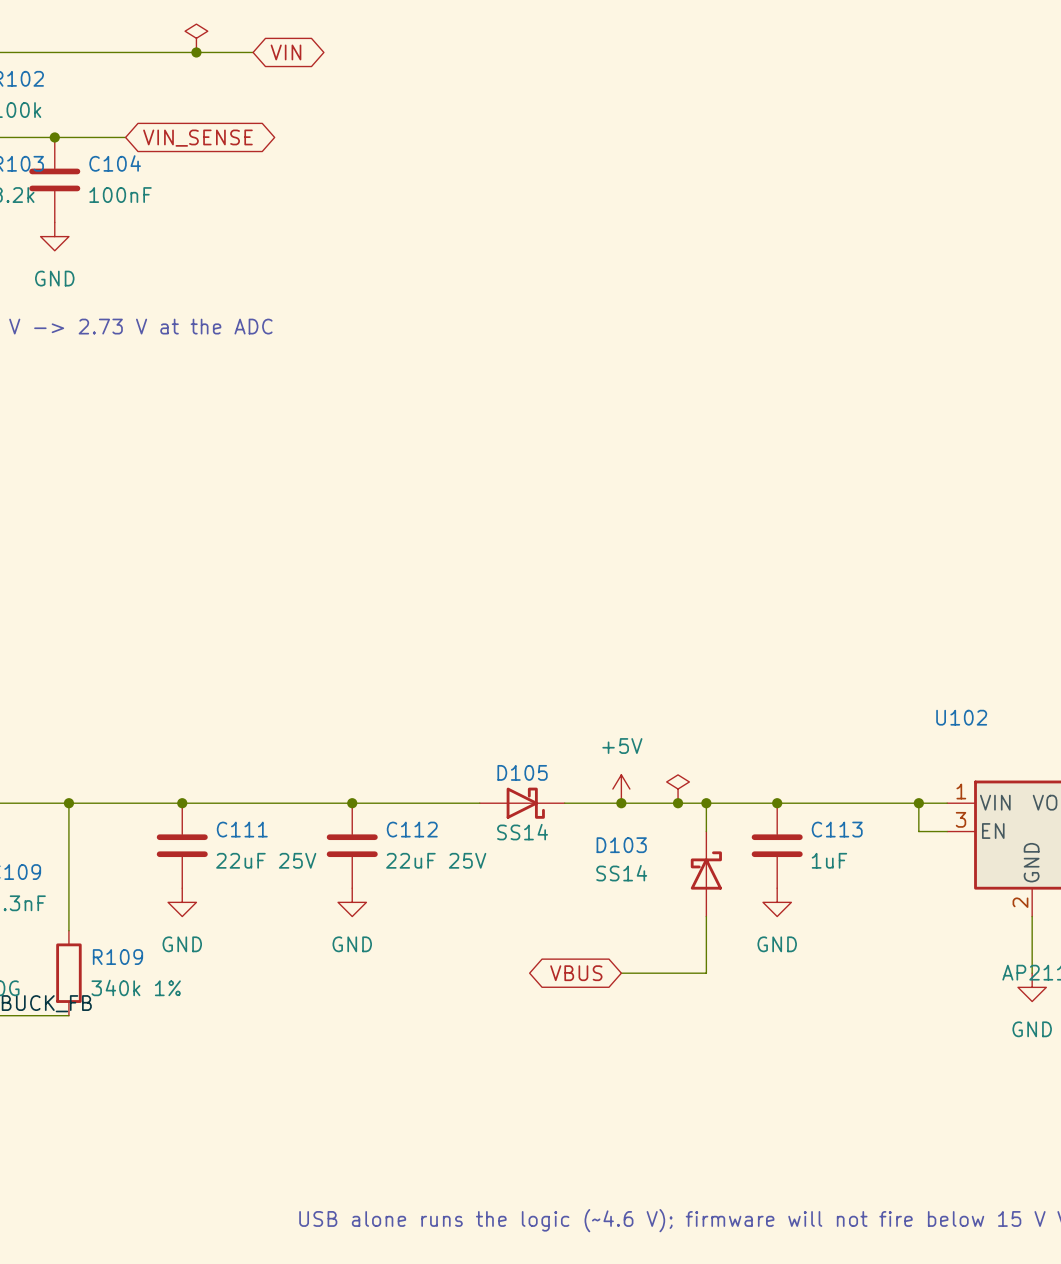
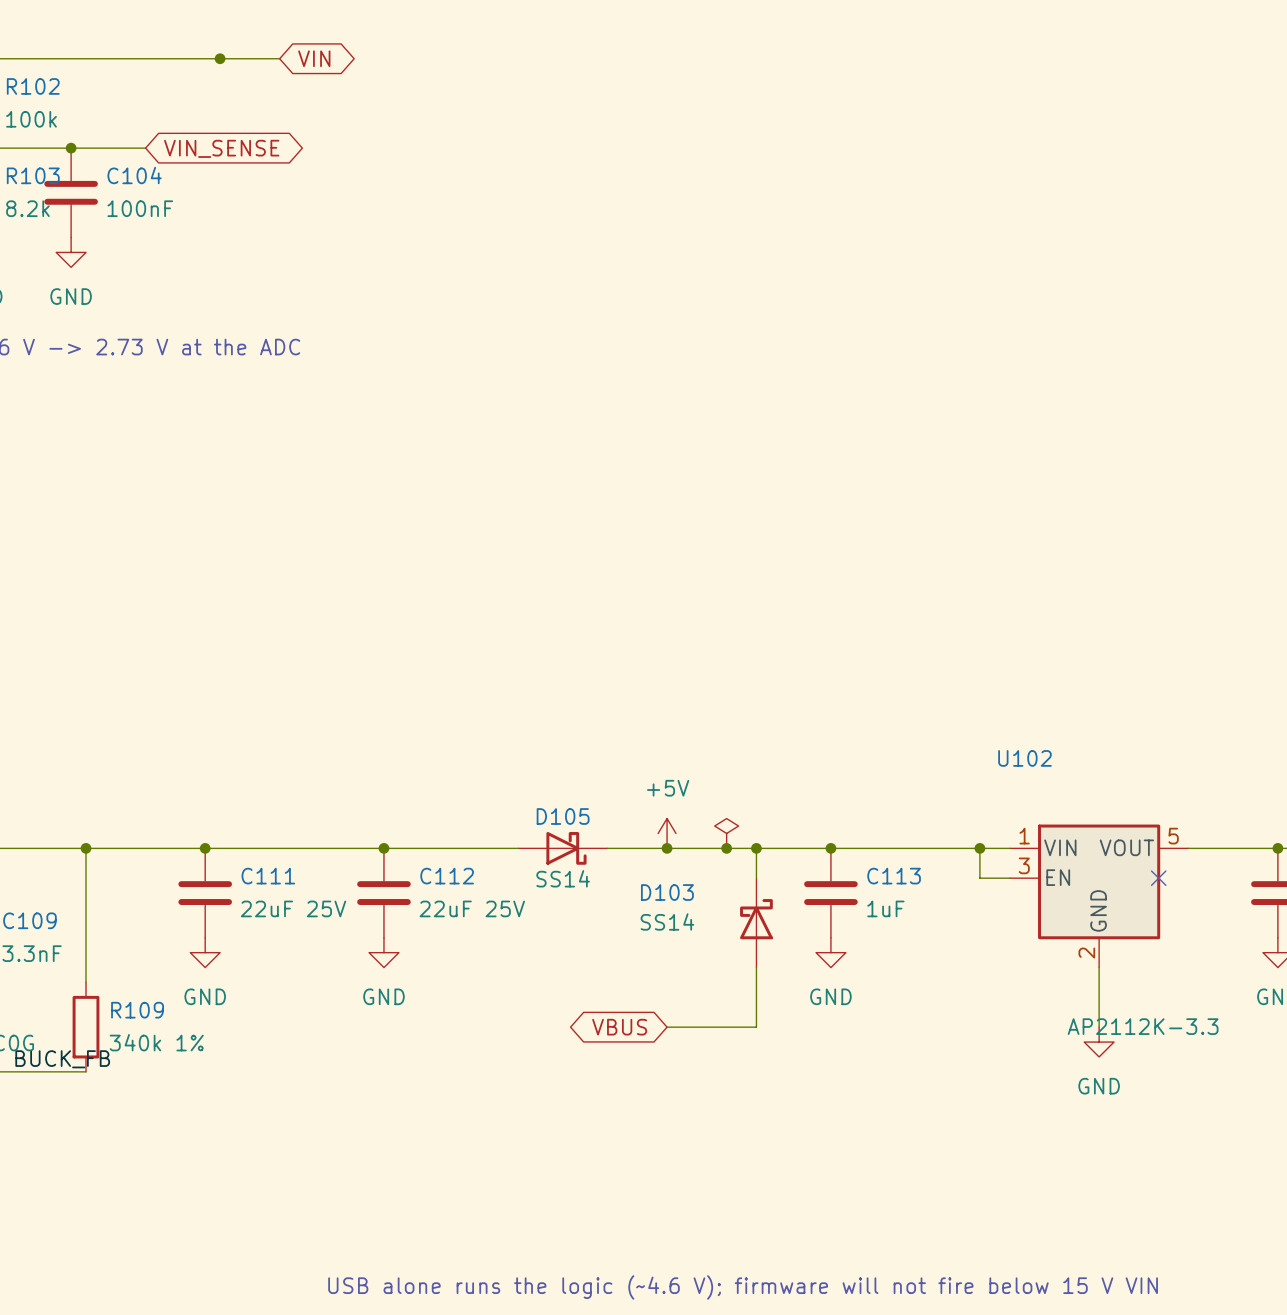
power symbol: (196, 38) -> none

